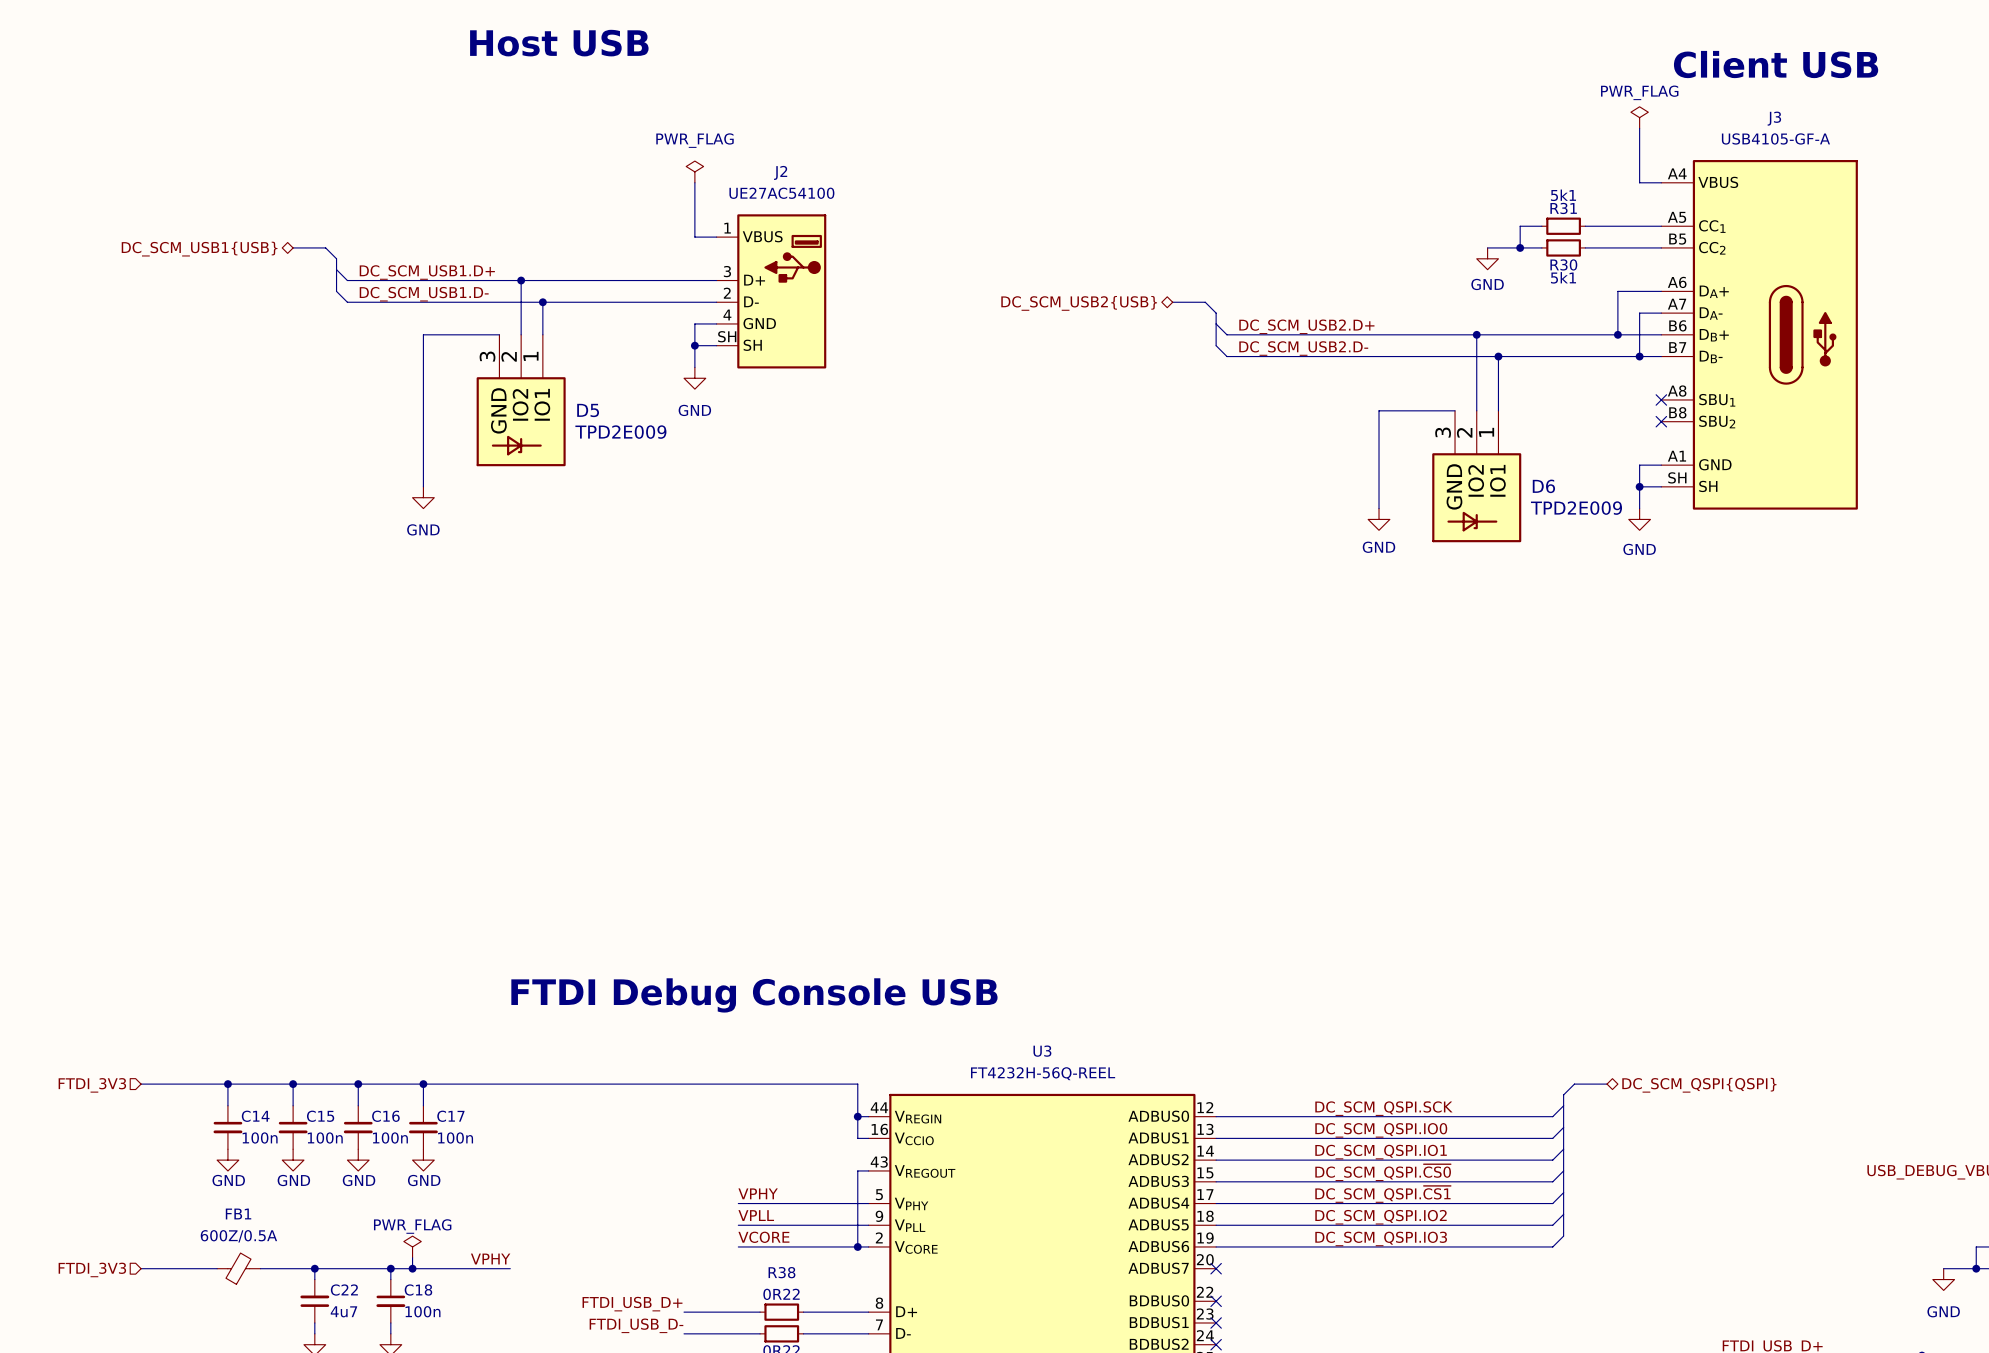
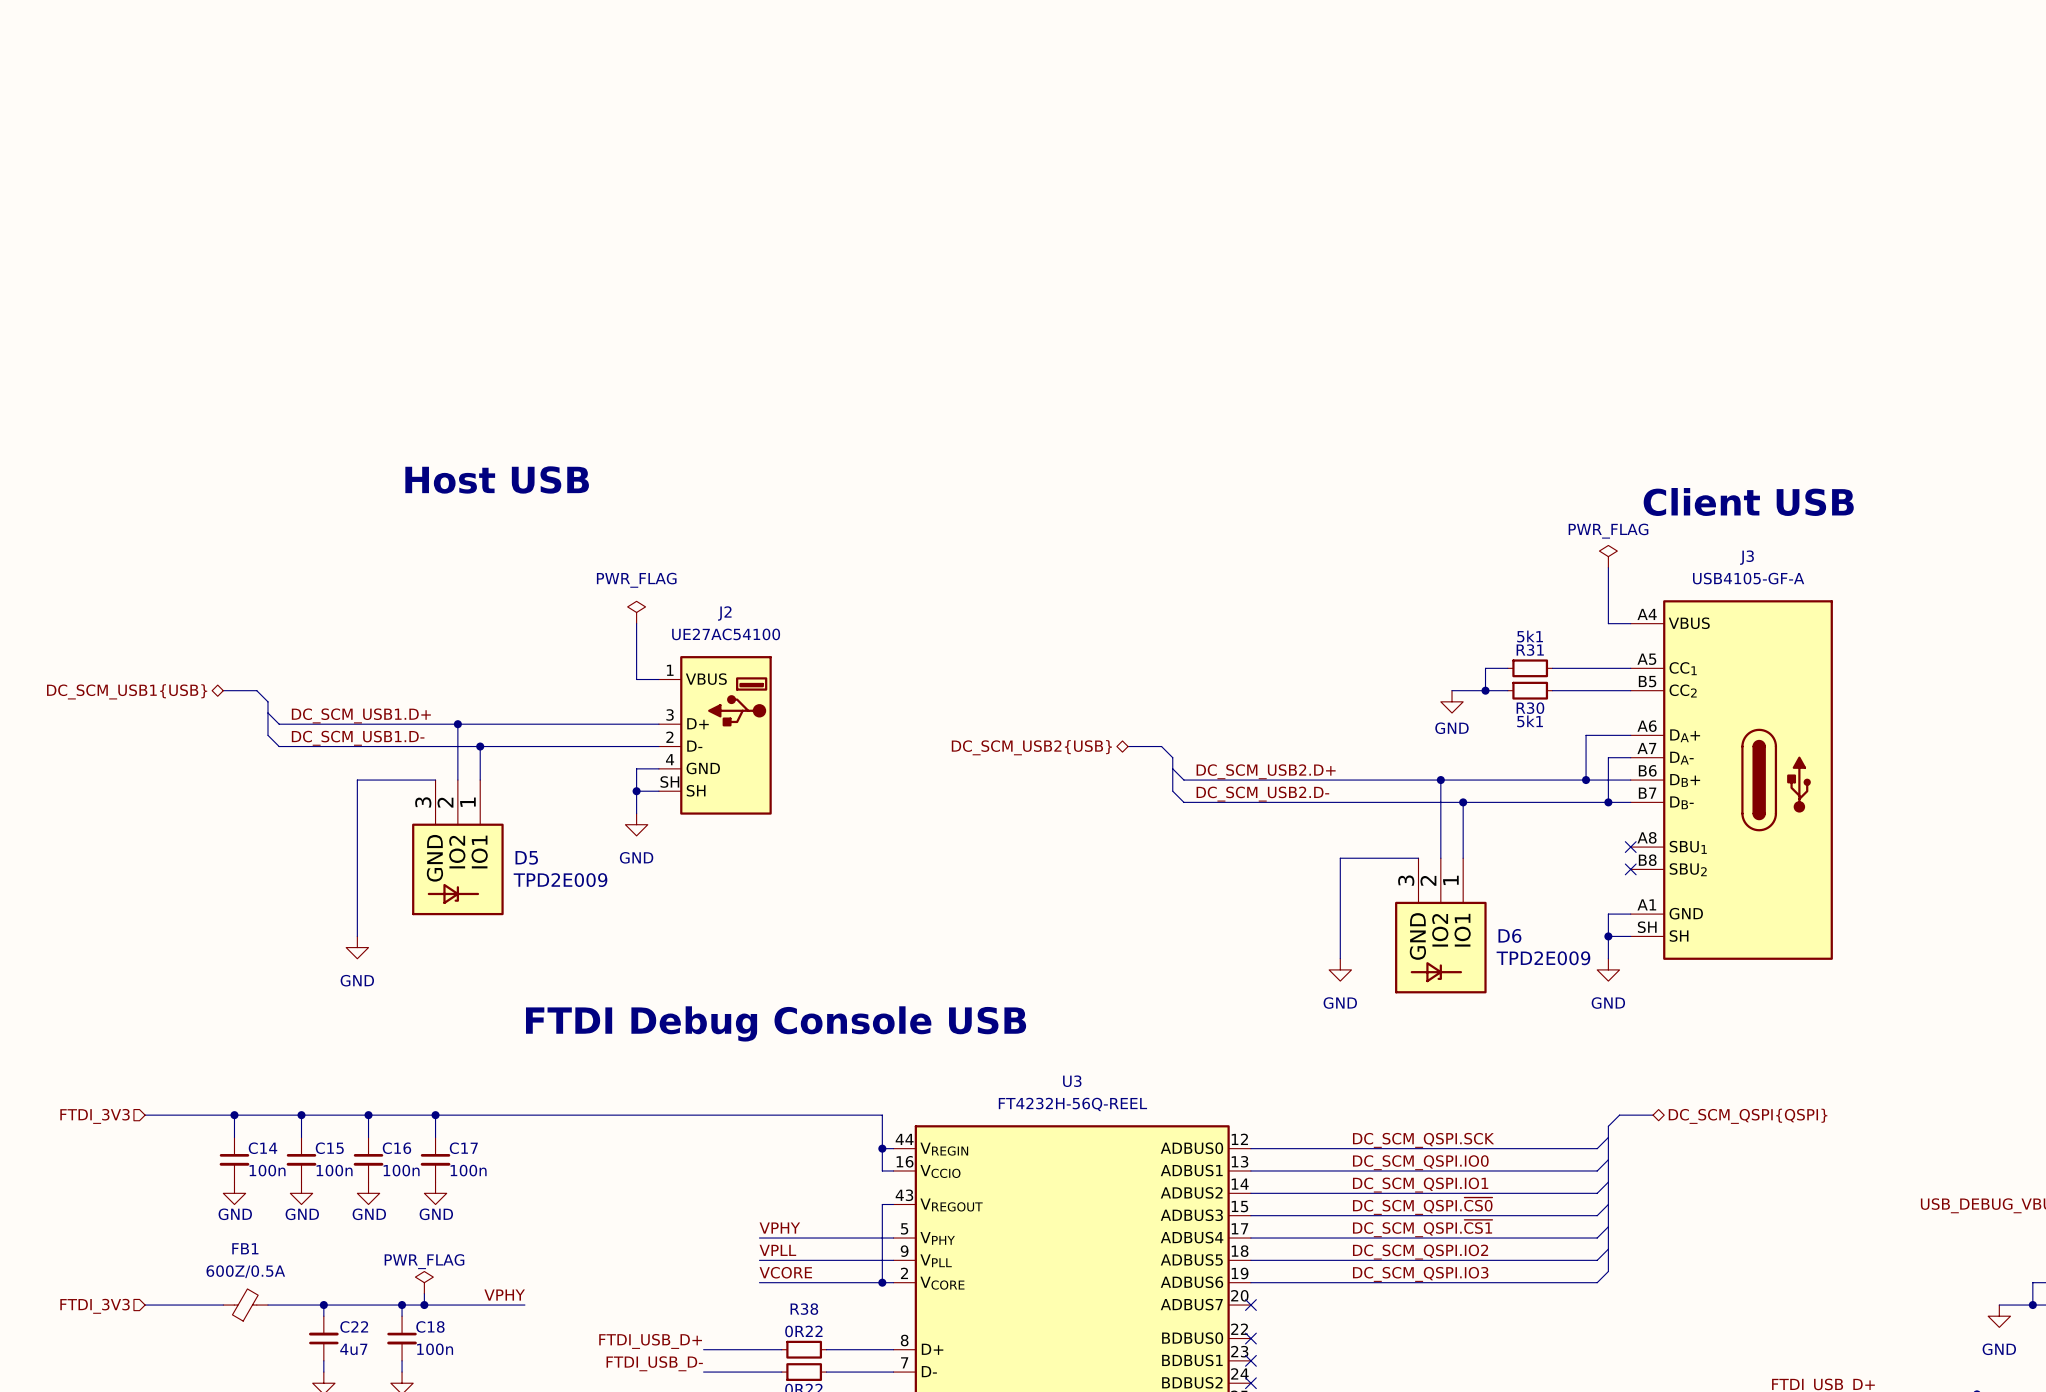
text: Host USB (559, 43) -> none
text: Client USB (1776, 64) -> none
power symbol: PWR_FLAG (1639, 117) -> none
wire: (1639, 128) (1639, 182) (1661, 182) -> none
power symbol: PWR_FLAG (694, 171) -> none
wire: (694, 182) (694, 237) (716, 237) -> none
wire: (1541, 226) (1520, 226) (1520, 247) -> none
R30 position: (1563, 226) -> (1530, 668)
wire: (1585, 226) (1661, 226) -> none
bus: (293, 247) (325, 247) (336, 258) (336, 291) -> none
wire: (1487, 247) (1541, 247) -> none
junction: (1520, 247) -> none
R31 position: (1563, 247) -> (1530, 690)
wire: (1585, 247) (1661, 247) -> none
hierarchical label: DC_SCM_USB1{USB} (199, 249) -> none
power symbol: GND (1487, 258) -> none
wire: (336, 269) (347, 280) (716, 280) -> none
label: DC_SCM_USB1.D+ (427, 272) -> none
wire: (521, 280) (521, 334) -> none
junction: (521, 280) -> none
wire: (336, 291) (347, 302) (716, 302) -> none
J2 position: (771, 291) -> (715, 735)
wire: (1661, 291) (1617, 291) (1617, 334) -> none
label: DC_SCM_USB1.D- (424, 294) -> none
wire: (542, 302) (542, 334) -> none
junction: (542, 302) -> none
bus: (1172, 302) (1205, 302) (1216, 313) (1216, 345) -> none
hierarchical label: DC_SCM_USB2{USB} (1079, 303) -> none
wire: (1661, 313) (1639, 313) (1639, 356) -> none
wire: (716, 323) (694, 323) (694, 367) -> none
wire: (1216, 323) (1226, 334) (1661, 334) -> none
label: DC_SCM_USB2.D+ (1306, 326) -> none
wire: (499, 334) (423, 334) (423, 486) -> none
wire: (1476, 334) (1476, 410) -> none
junction: (1476, 334) -> none
junction: (1617, 334) -> none
J3 position: (1759, 334) -> (1731, 780)
wire: (694, 345) (716, 345) -> none
junction: (694, 345) -> none
wire: (1216, 345) (1226, 356) (1661, 356) -> none
label: DC_SCM_USB2.D- (1303, 348) -> none
wire: (1498, 356) (1498, 410) -> none
junction: (1498, 356) -> none
junction: (1639, 356) -> none
power symbol: GND (694, 378) -> none
no-connect mark: (1661, 399) -> none
D5 position: (521, 400) -> (457, 847)
wire: (1455, 410) (1379, 410) (1379, 508) -> none
no-connect mark: (1661, 421) -> none
wire: (1661, 465) (1639, 465) (1639, 508) -> none
text: none -> Host USB (497, 479)
D6 position: (1476, 476) -> (1440, 925)
wire: (1639, 486) (1661, 486) -> none
junction: (1639, 486) -> none
text: none -> Client USB (1748, 501)
power symbol: GND (423, 497) -> none
power symbol: GND (1379, 519) -> none
power symbol: GND (1639, 519) -> none
power symbol: none -> PWR_FLAG (1608, 556)
wire: none -> (1608, 567) (1608, 623) (1630, 623)
power symbol: none -> PWR_FLAG (636, 612)
wire: none -> (636, 623) (636, 679) (658, 679)
wire: none -> (1507, 668) (1485, 668) (1485, 690)
wire: none -> (1552, 668) (1630, 668)
bus: none -> (223, 690) (256, 690) (267, 701) (267, 735)
wire: none -> (1452, 690) (1507, 690)
junction: none -> (1485, 690)
wire: none -> (1552, 690) (1630, 690)
hierarchical label: none -> DC_SCM_USB1{USB} (127, 691)
power symbol: none -> GND (1452, 701)
wire: none -> (267, 713) (279, 724) (658, 724)
label: none -> DC_SCM_USB1.D+ (361, 715)
wire: none -> (457, 724) (457, 780)
junction: none -> (457, 724)
wire: none -> (267, 735) (279, 746) (658, 746)
wire: none -> (1630, 735) (1586, 735) (1586, 780)
label: none -> DC_SCM_USB1.D- (358, 738)
wire: none -> (480, 746) (480, 780)
junction: none -> (480, 746)
bus: none -> (1128, 746) (1161, 746) (1172, 757) (1172, 791)
hierarchical label: none -> DC_SCM_USB2{USB} (1031, 747)
wire: none -> (1630, 757) (1608, 757) (1608, 802)
wire: none -> (658, 768) (636, 768) (636, 813)
wire: none -> (1172, 768) (1183, 780) (1630, 780)
label: none -> DC_SCM_USB2.D+ (1266, 771)
wire: none -> (435, 780) (357, 780) (357, 936)
wire: none -> (1440, 780) (1440, 858)
junction: none -> (1440, 780)
junction: none -> (1586, 780)
wire: none -> (636, 791) (658, 791)
junction: none -> (636, 791)
wire: none -> (1172, 791) (1183, 802) (1630, 802)
label: none -> DC_SCM_USB2.D- (1262, 794)
wire: none -> (1463, 802) (1463, 858)
junction: none -> (1463, 802)
junction: none -> (1608, 802)
power symbol: none -> GND (636, 824)
no-connect mark: none -> (1630, 847)
wire: none -> (1418, 858) (1340, 858) (1340, 958)
no-connect mark: none -> (1630, 869)
wire: none -> (1630, 914) (1608, 914) (1608, 958)
wire: none -> (1608, 936) (1630, 936)
junction: none -> (1608, 936)
power symbol: none -> GND (357, 947)
power symbol: none -> GND (1340, 969)
power symbol: none -> GND (1608, 969)

